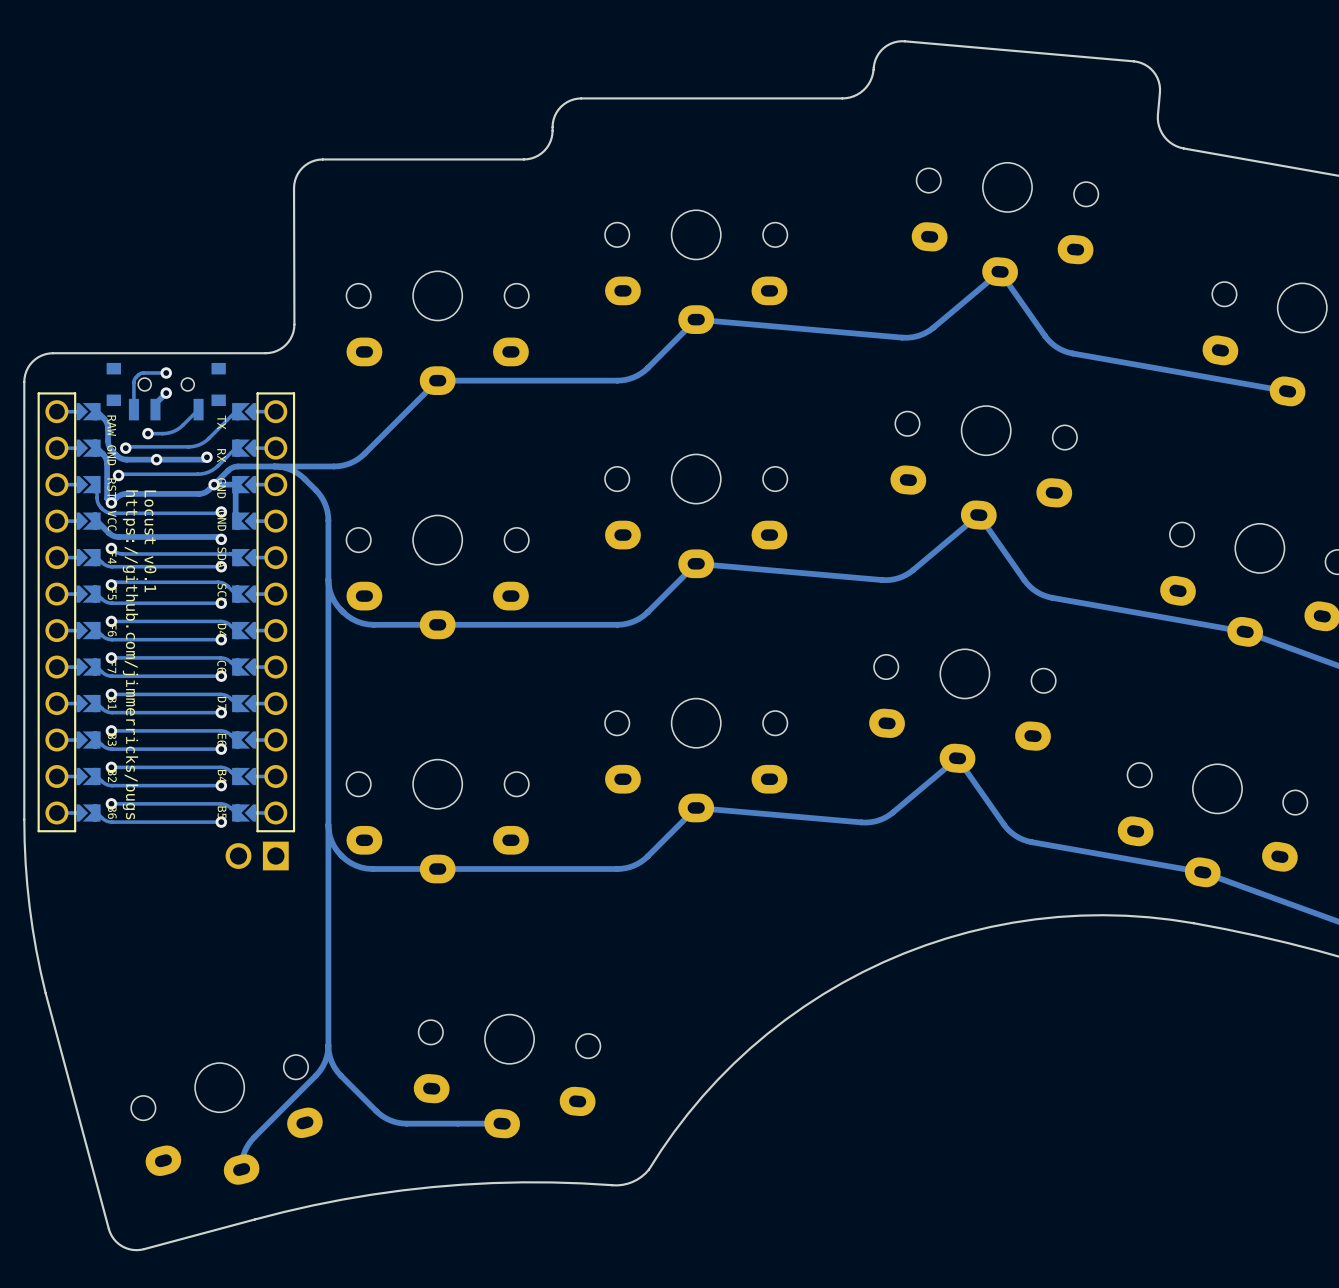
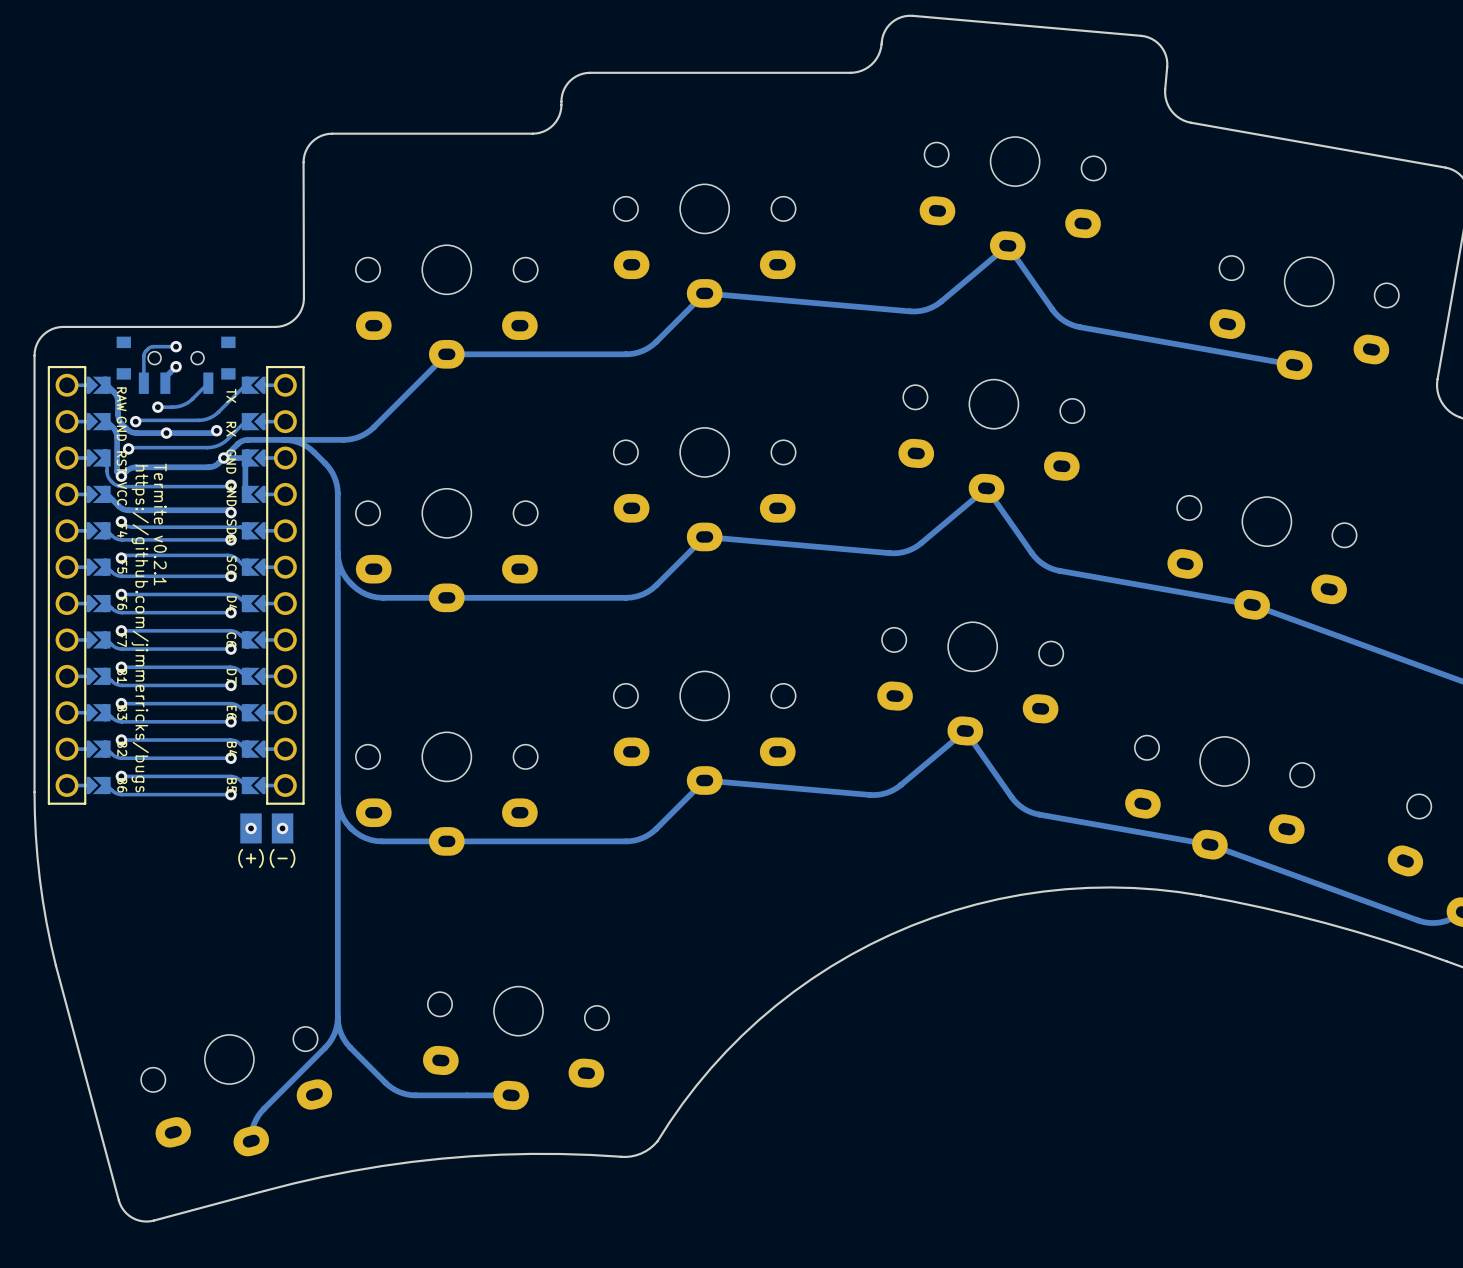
text: Locust v0.1 (150, 541) -> Termite v0.2.1 (160, 524)
part footprint: [225, 841, 289, 871] -> [240, 813, 294, 844]
via: none -> (251, 828)
via: none -> (282, 828)

